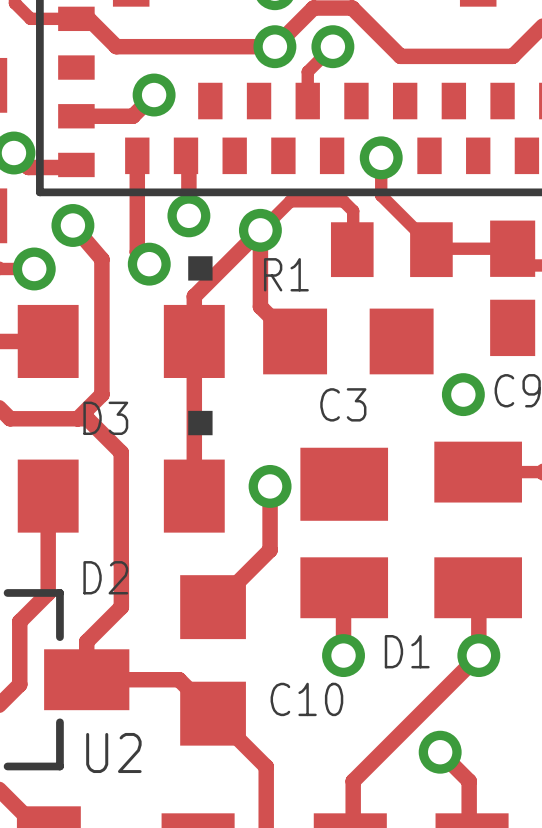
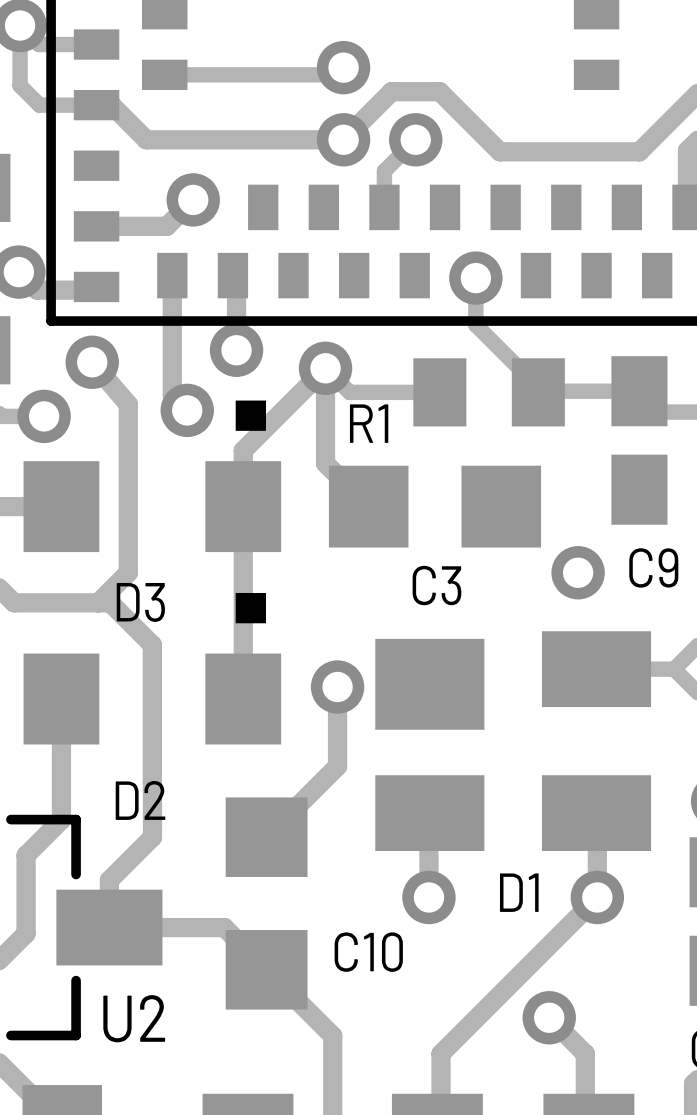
track: (261, 230) (290, 201) (343, 201) (353, 210) (353, 248) -> (325, 368) (349, 392) (439, 392)

